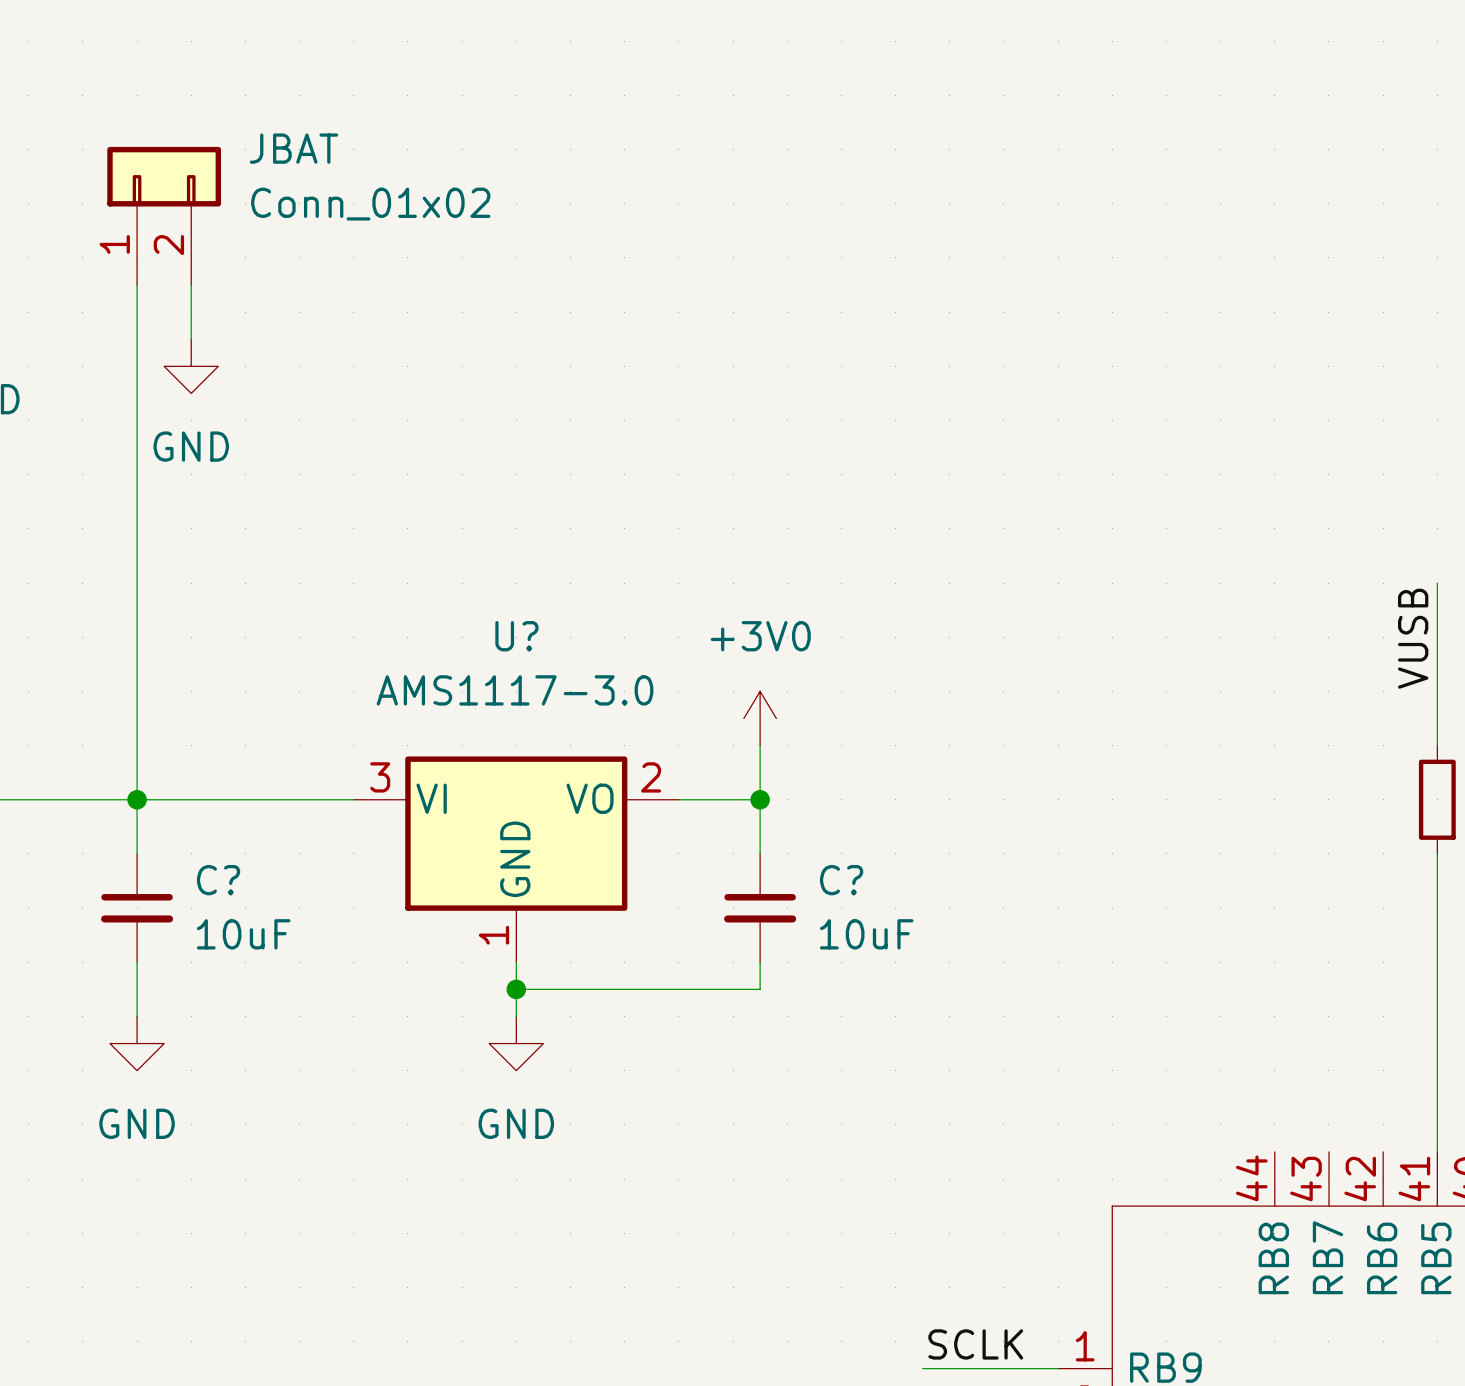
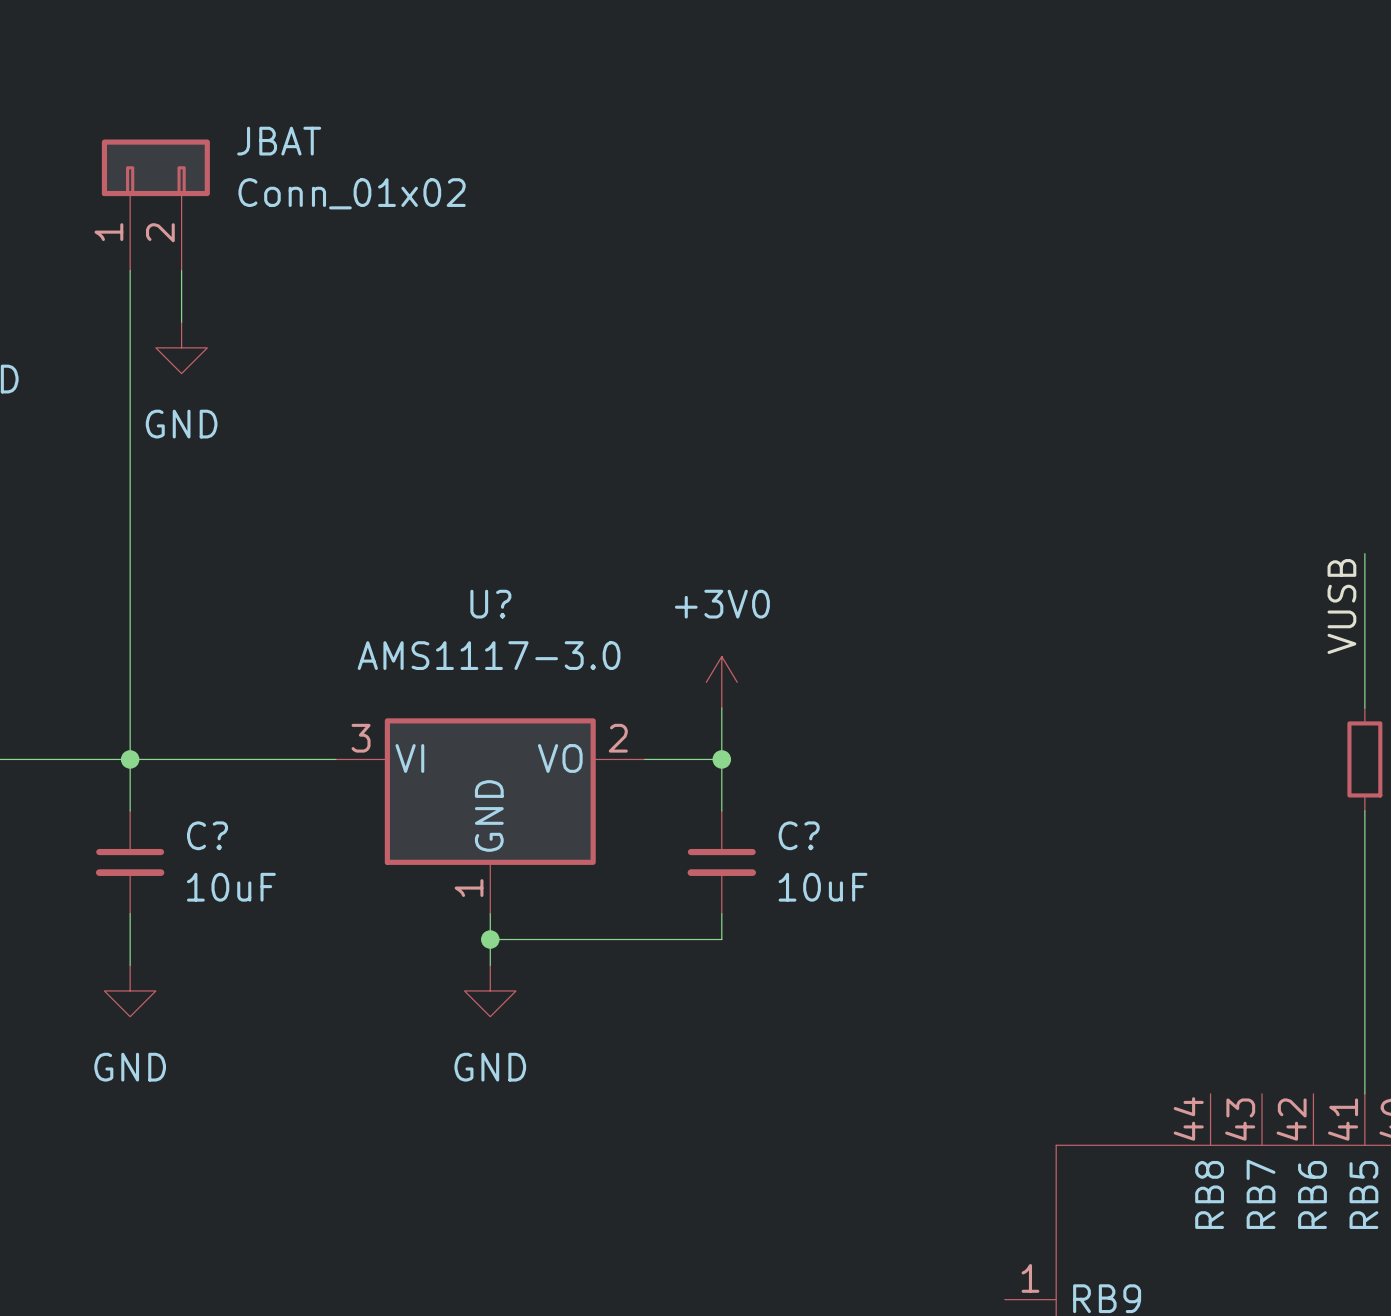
label: SCLK (975, 1344) -> none
wire: (922, 1368) (1058, 1368) -> none

